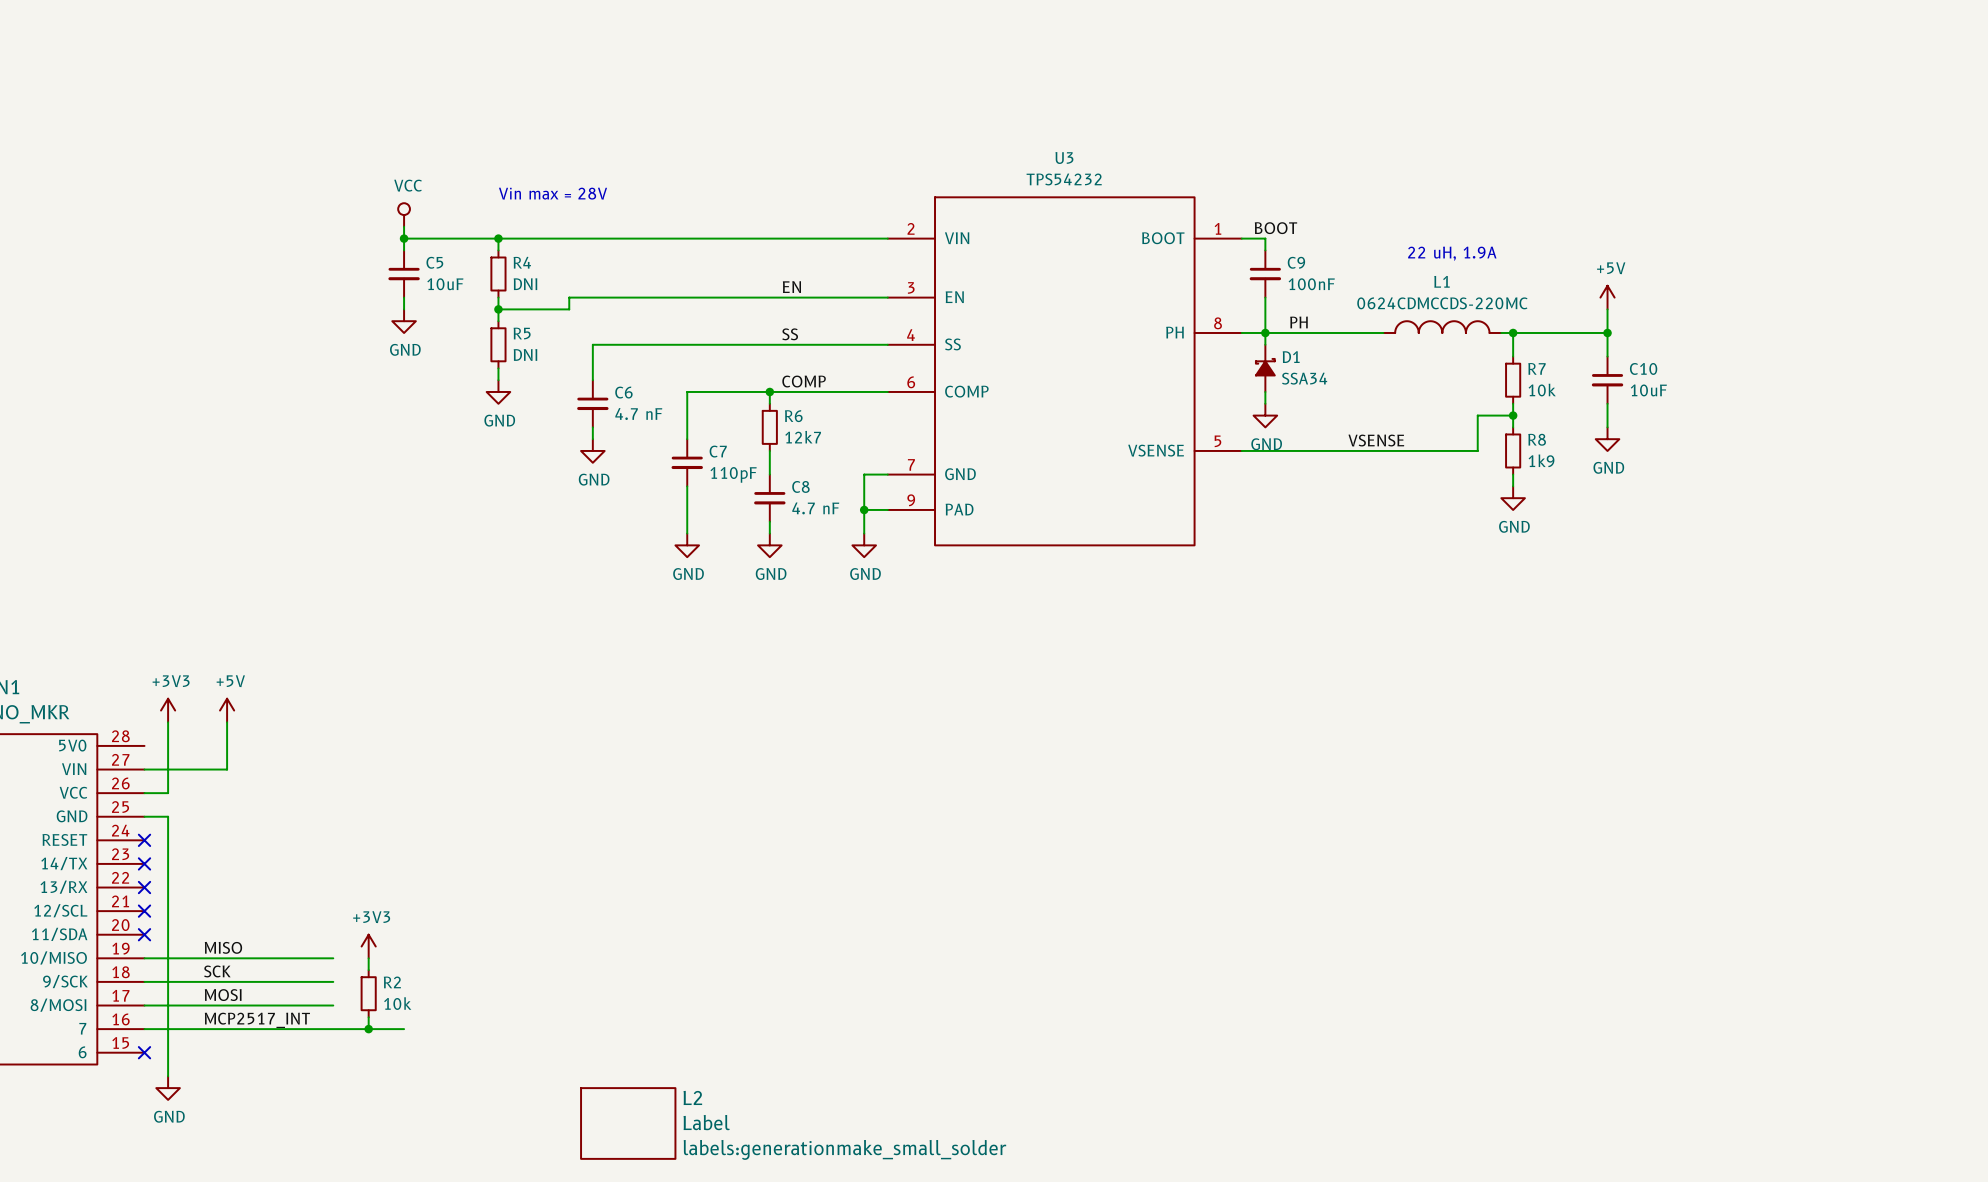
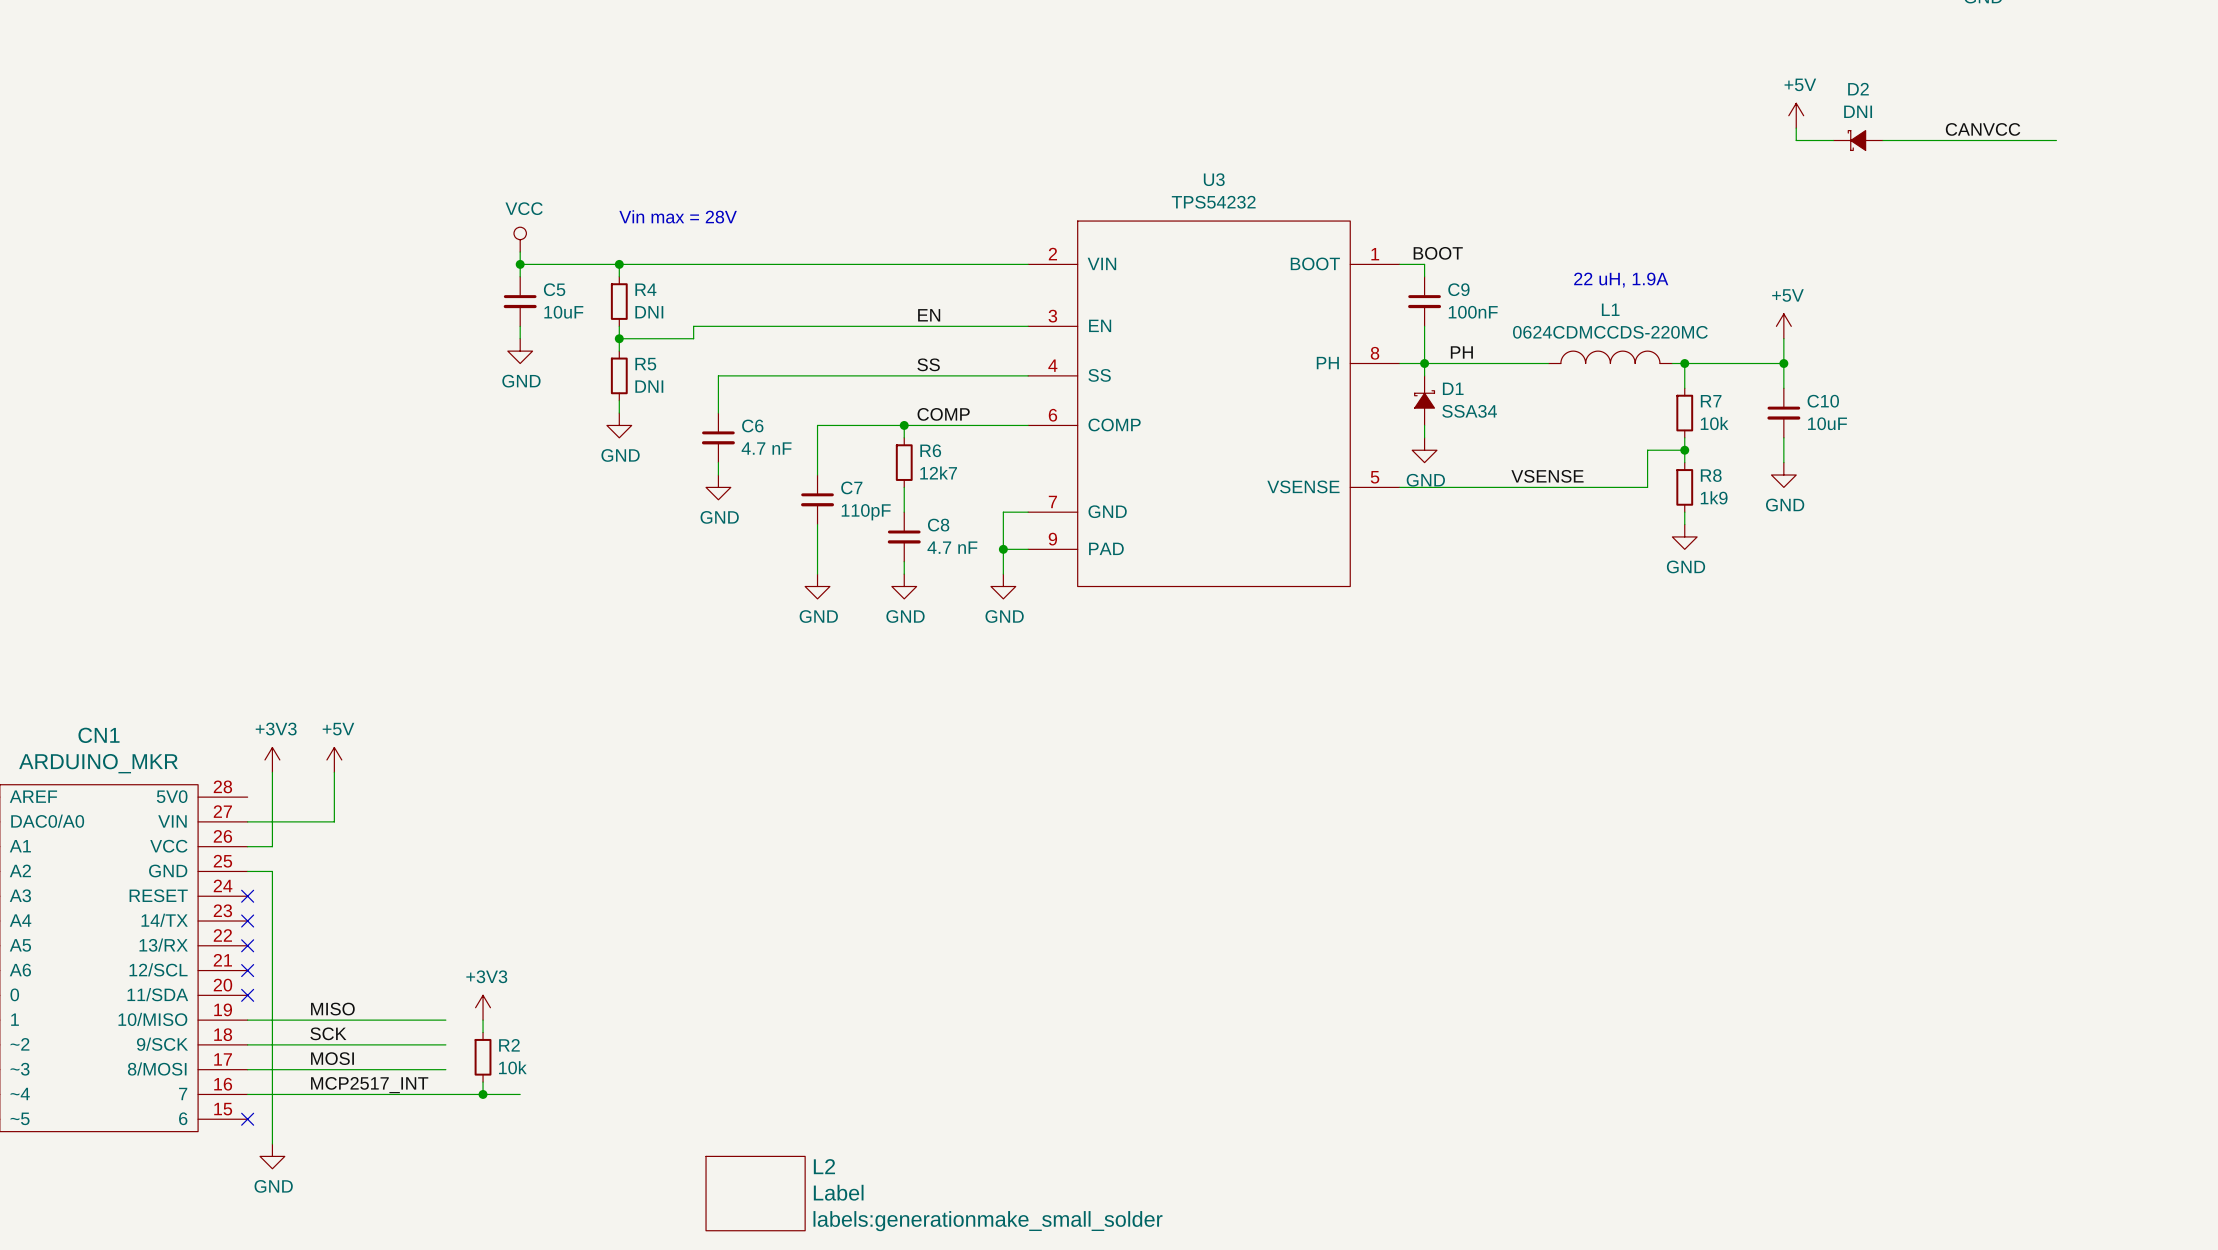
power symbol: none -> +5V (1796, 115)
wire: none -> (1796, 128) (1796, 140) (1833, 140)
label: none -> CANVCC (1983, 129)
D2: none -> DNI (1858, 140)
wire: none -> (1882, 140) (2056, 140)

